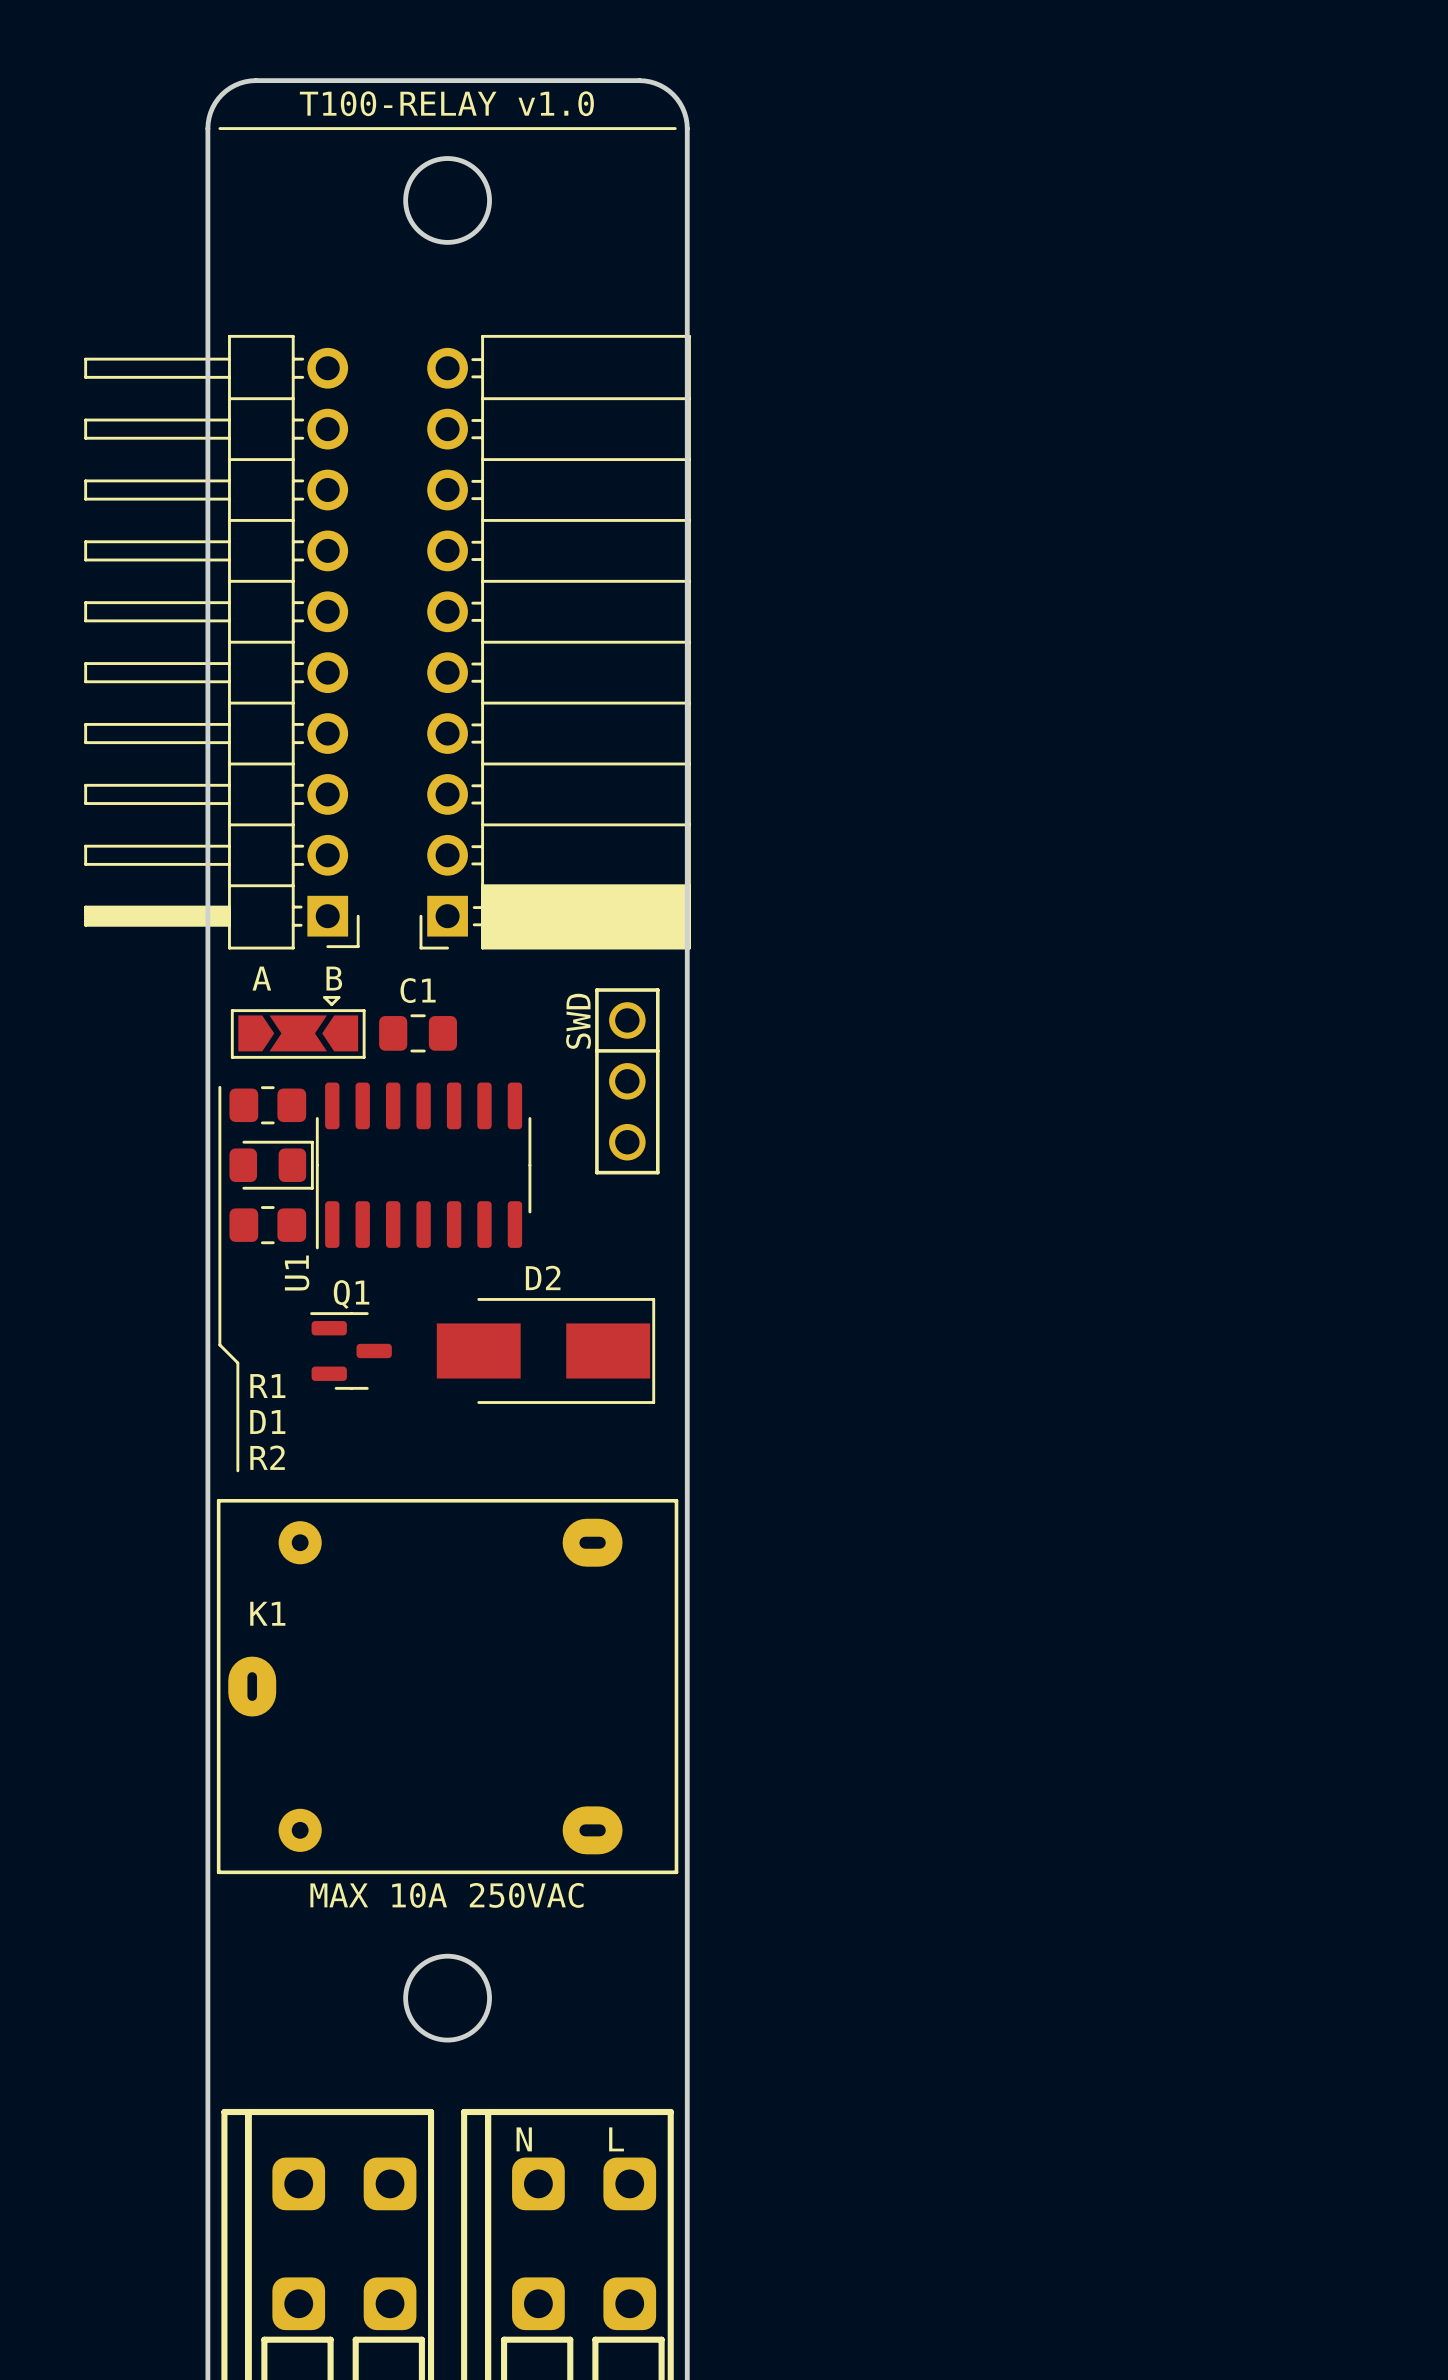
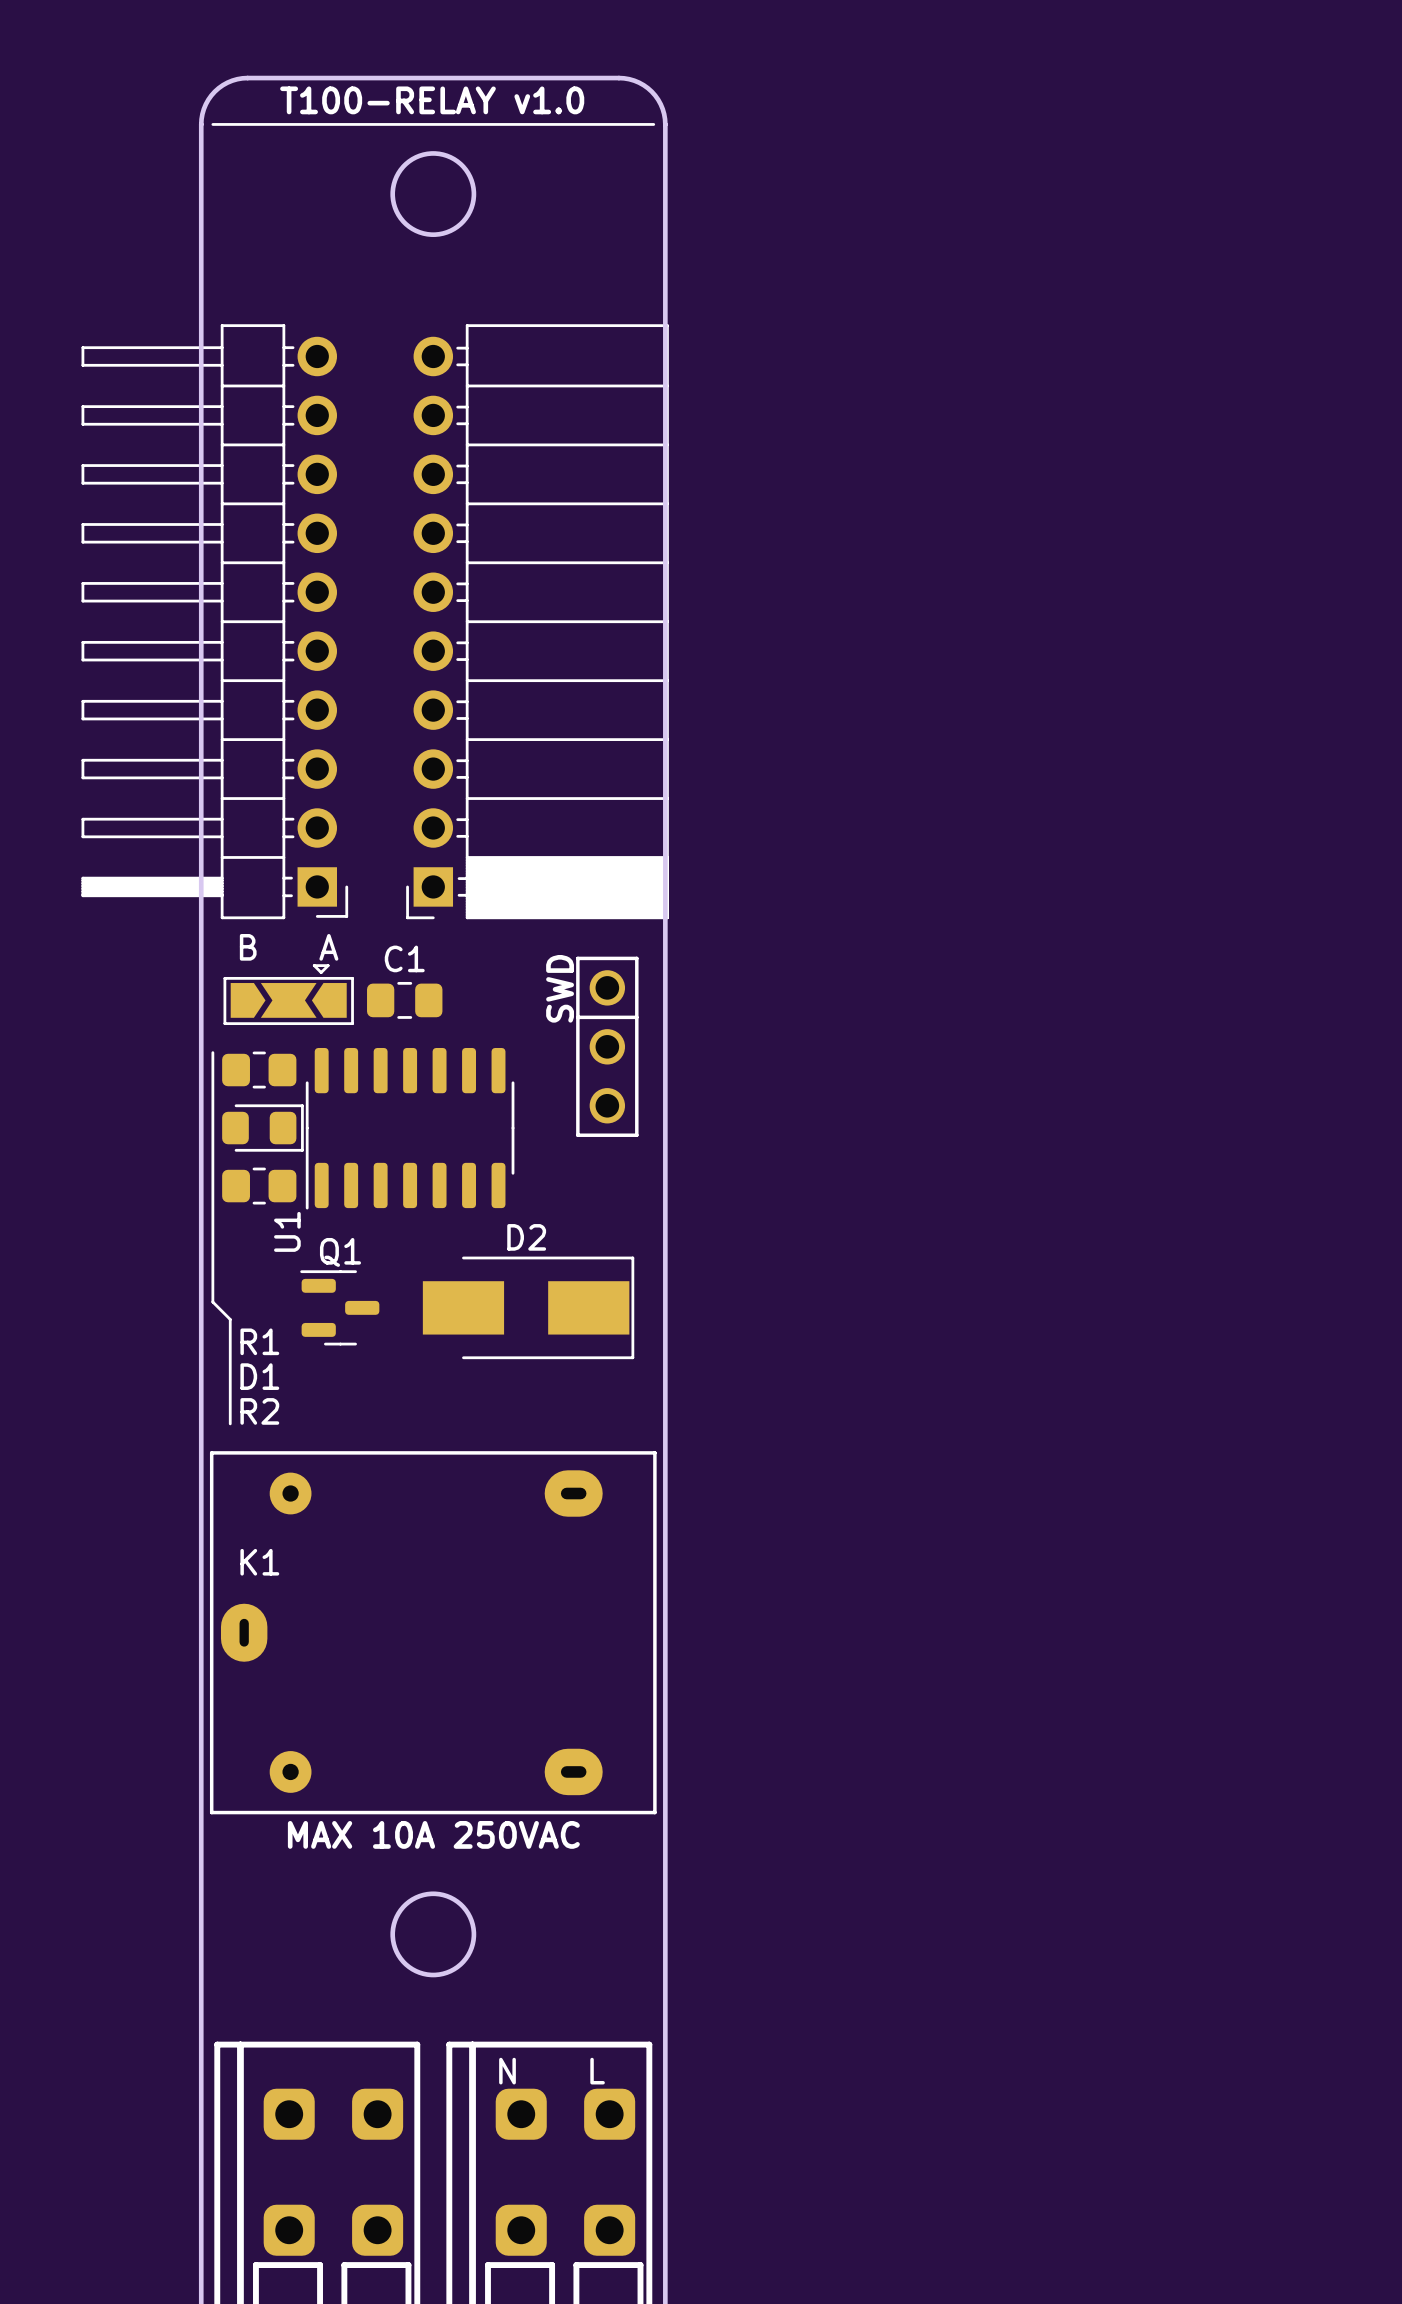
text: A (261, 978) -> B (248, 947)
text: B (334, 978) -> A (328, 947)

